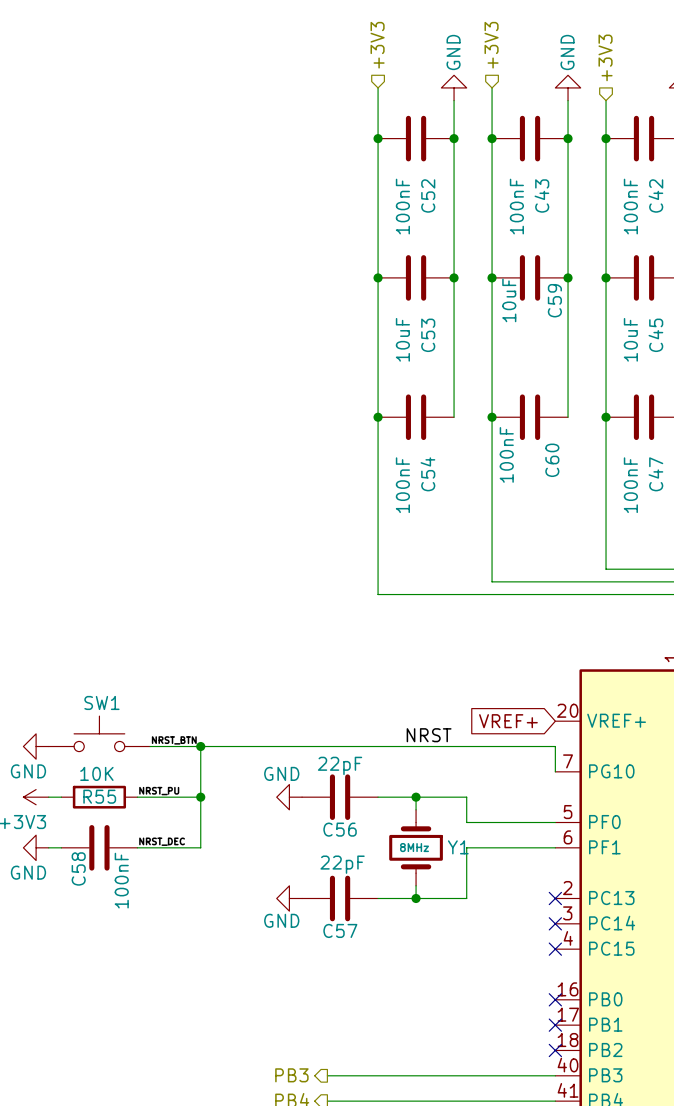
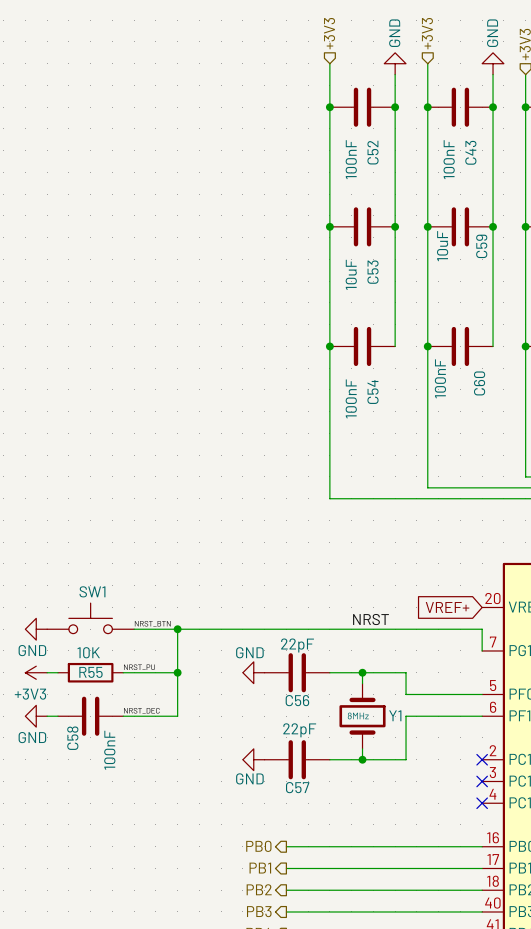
hierarchical label: none -> PB0 (258, 846)
wire: none -> (286, 846) (482, 846)
no-connect mark: (555, 999) -> none
hierarchical label: none -> PB1 (260, 868)
wire: none -> (286, 868) (482, 868)
no-connect mark: (555, 1025) -> none
hierarchical label: none -> PB2 (259, 889)
wire: none -> (286, 890) (482, 890)
no-connect mark: (555, 1050) -> none

